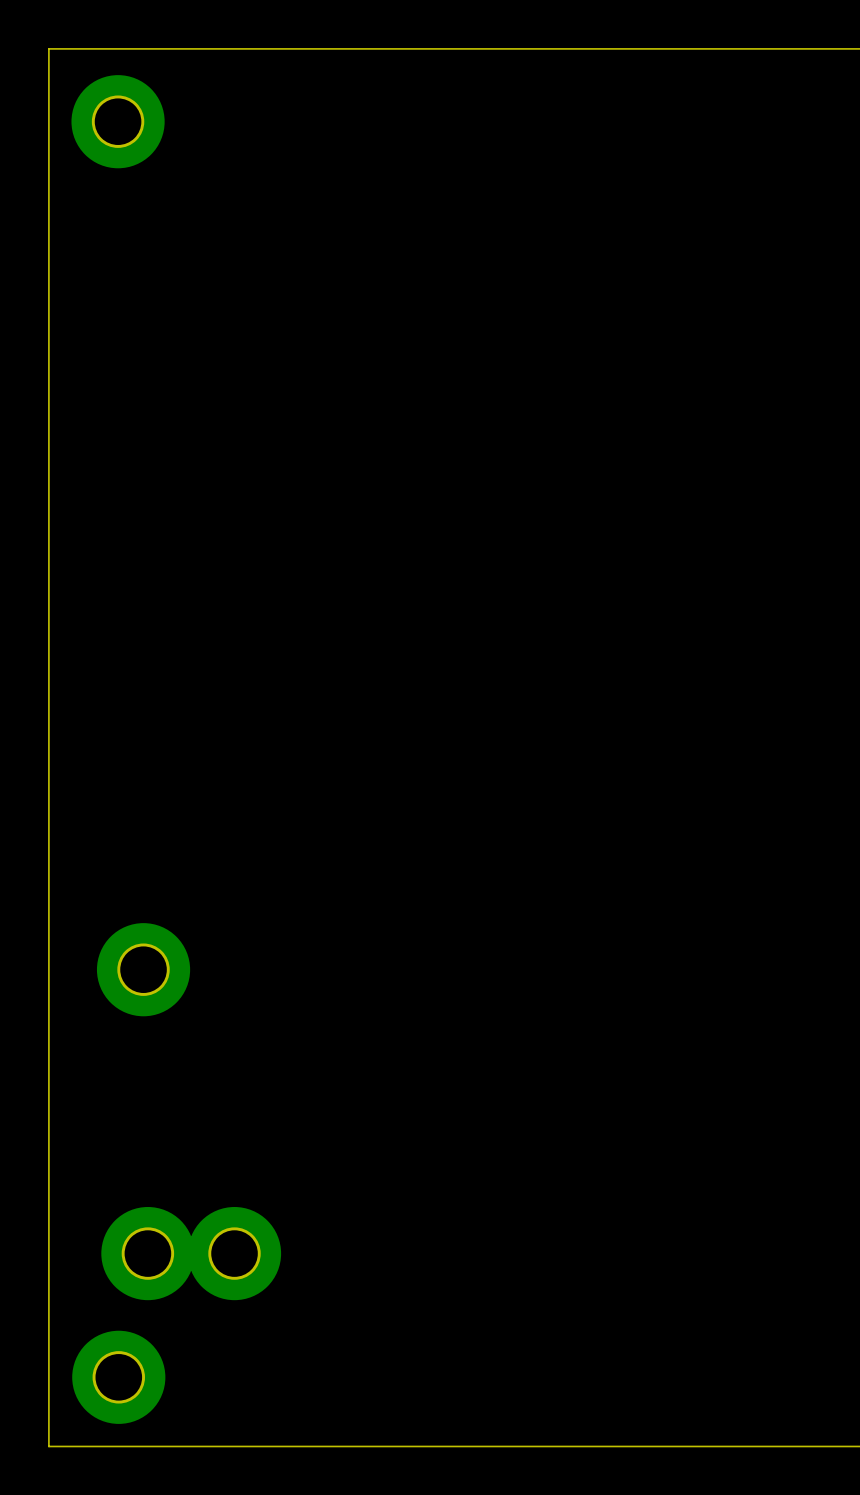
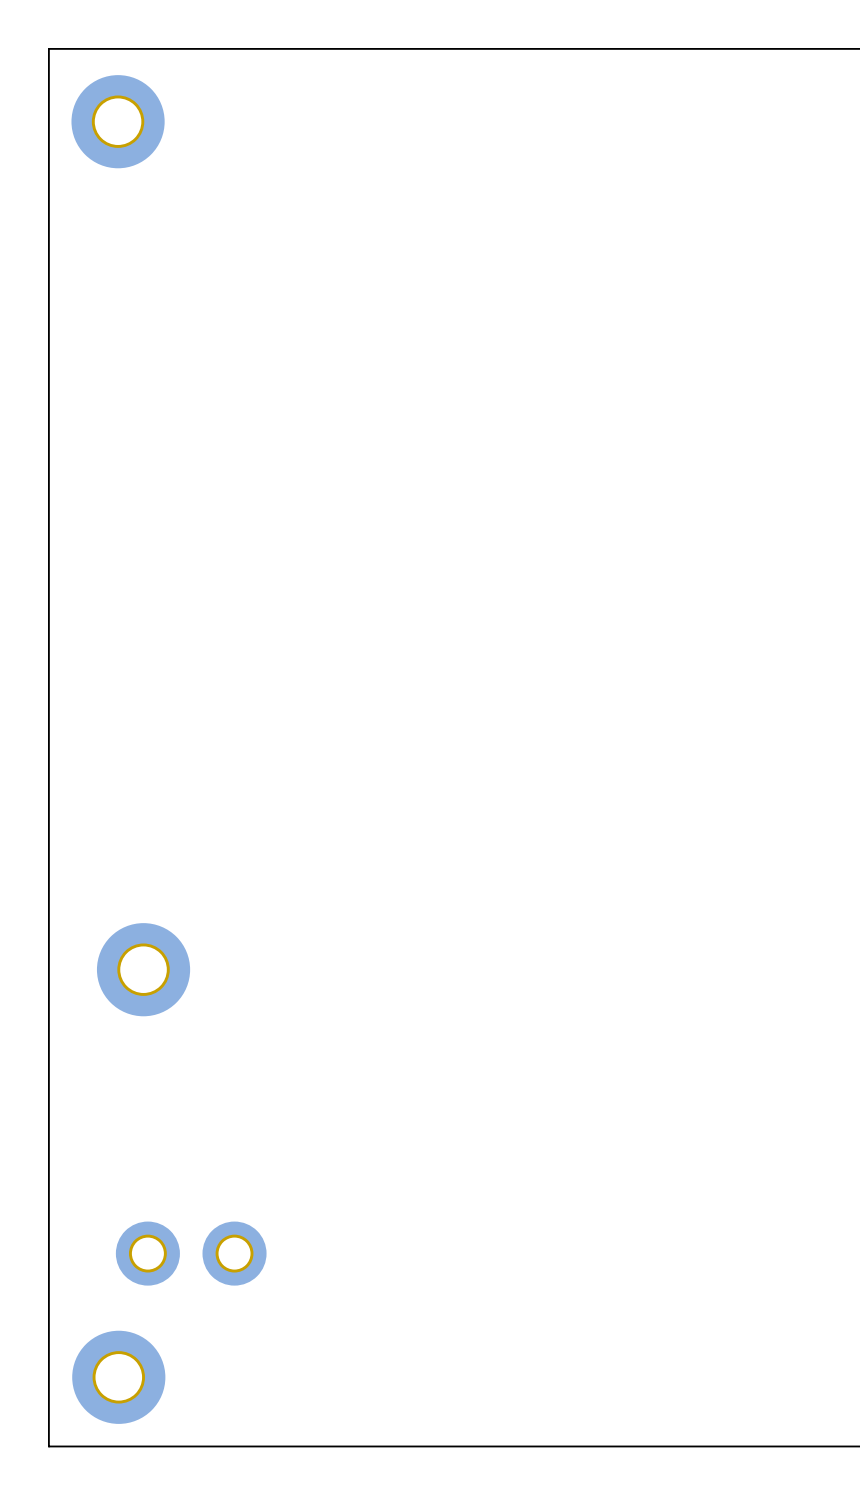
part footprint: [101, 1207, 195, 1301] -> [115, 1221, 180, 1286]
part footprint: [187, 1207, 282, 1301] -> [202, 1221, 267, 1286]

